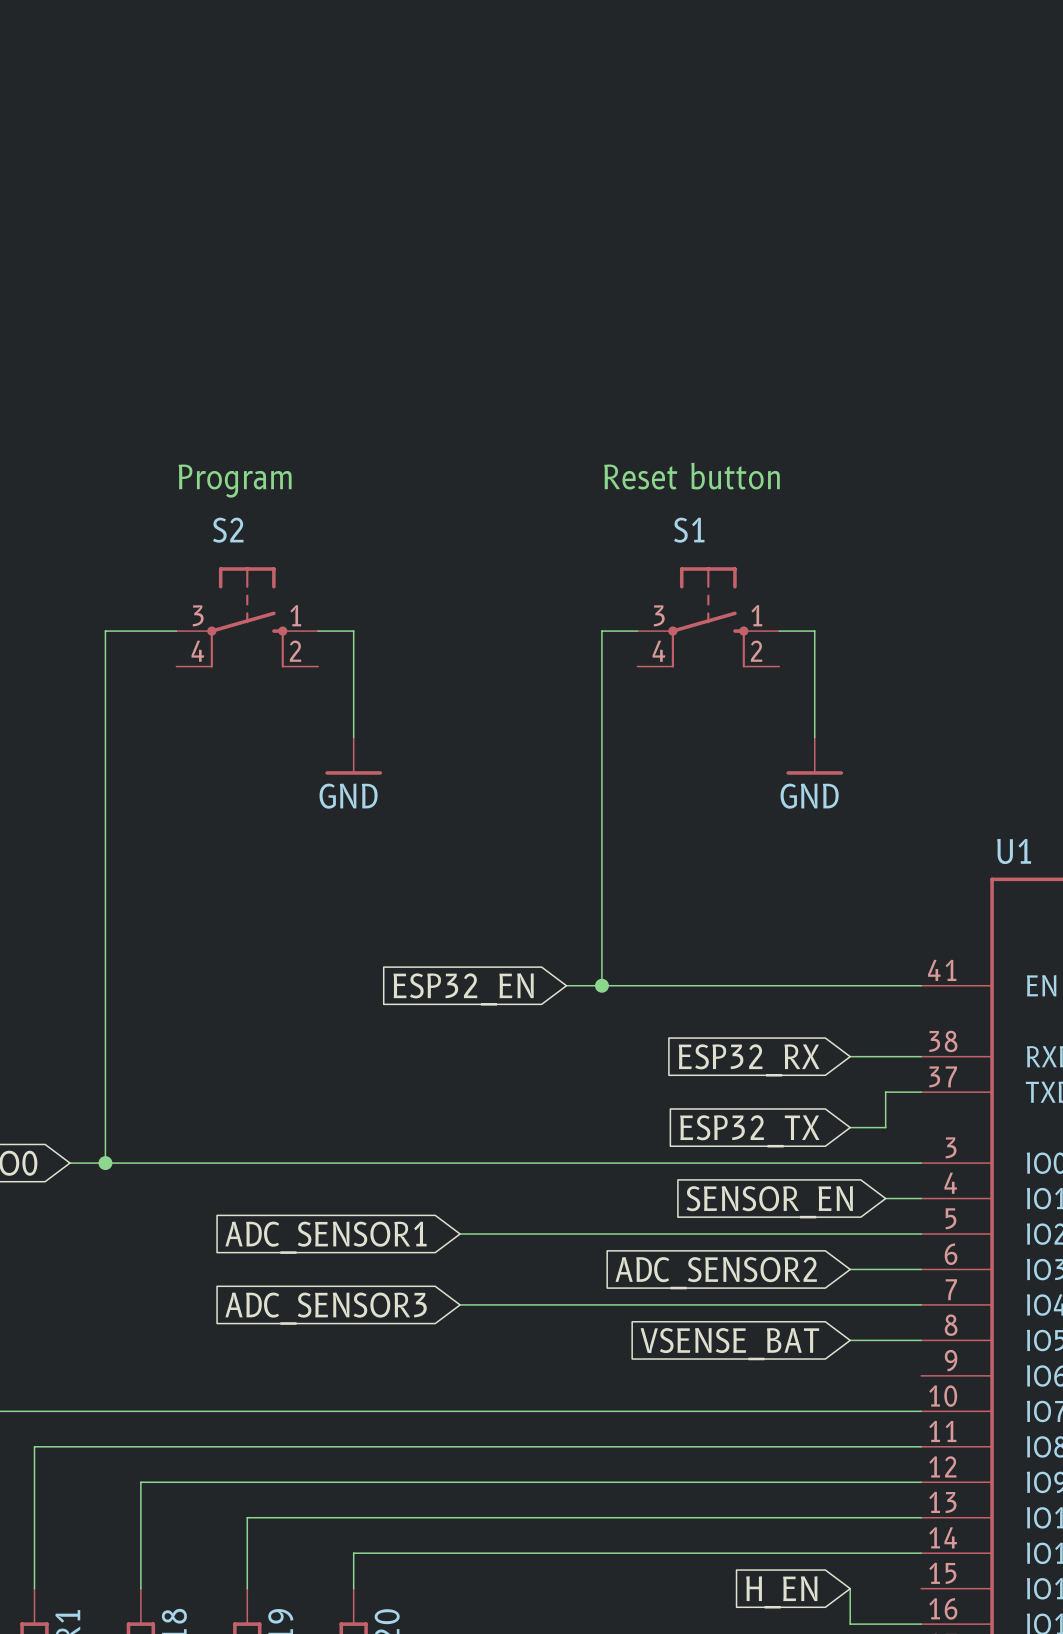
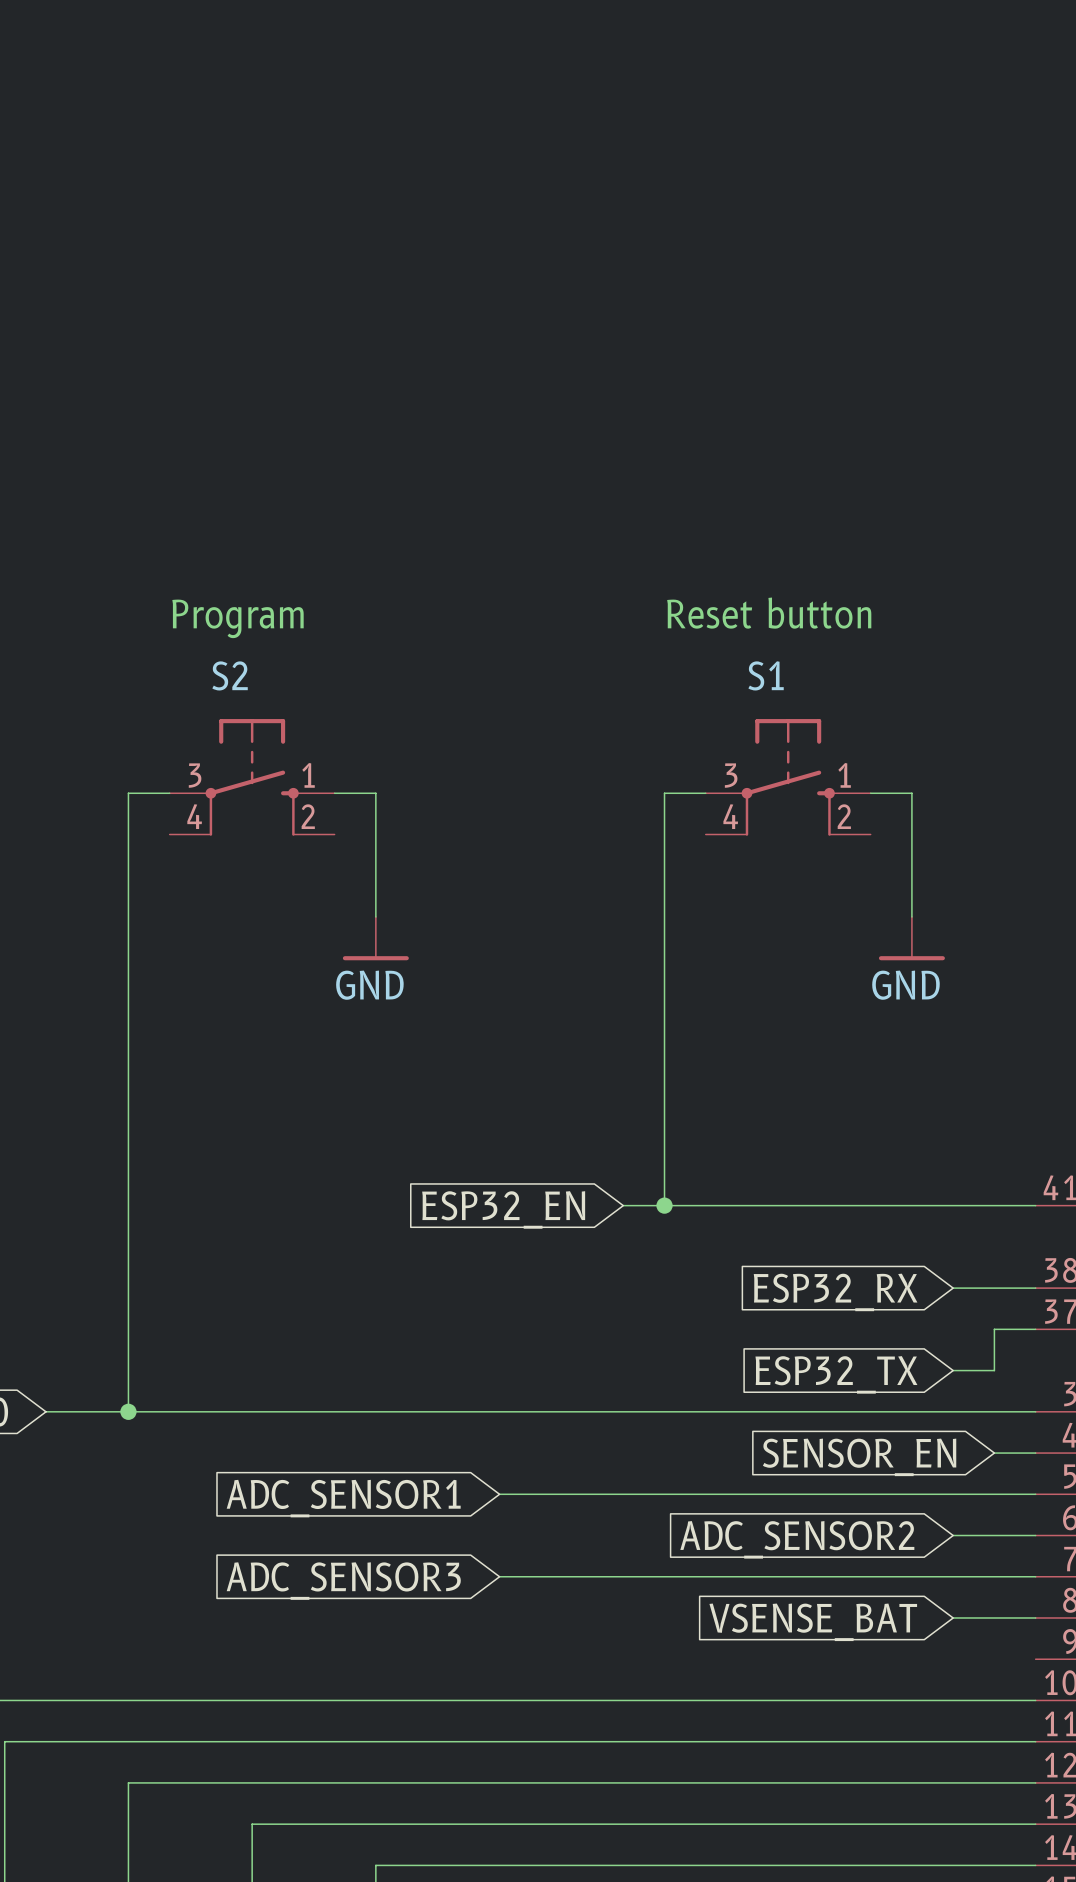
wire: (140, 631) (105, 631) (105, 1163) -> (128, 793) (128, 1411)
junction position: (105, 1163) -> (128, 1411)

